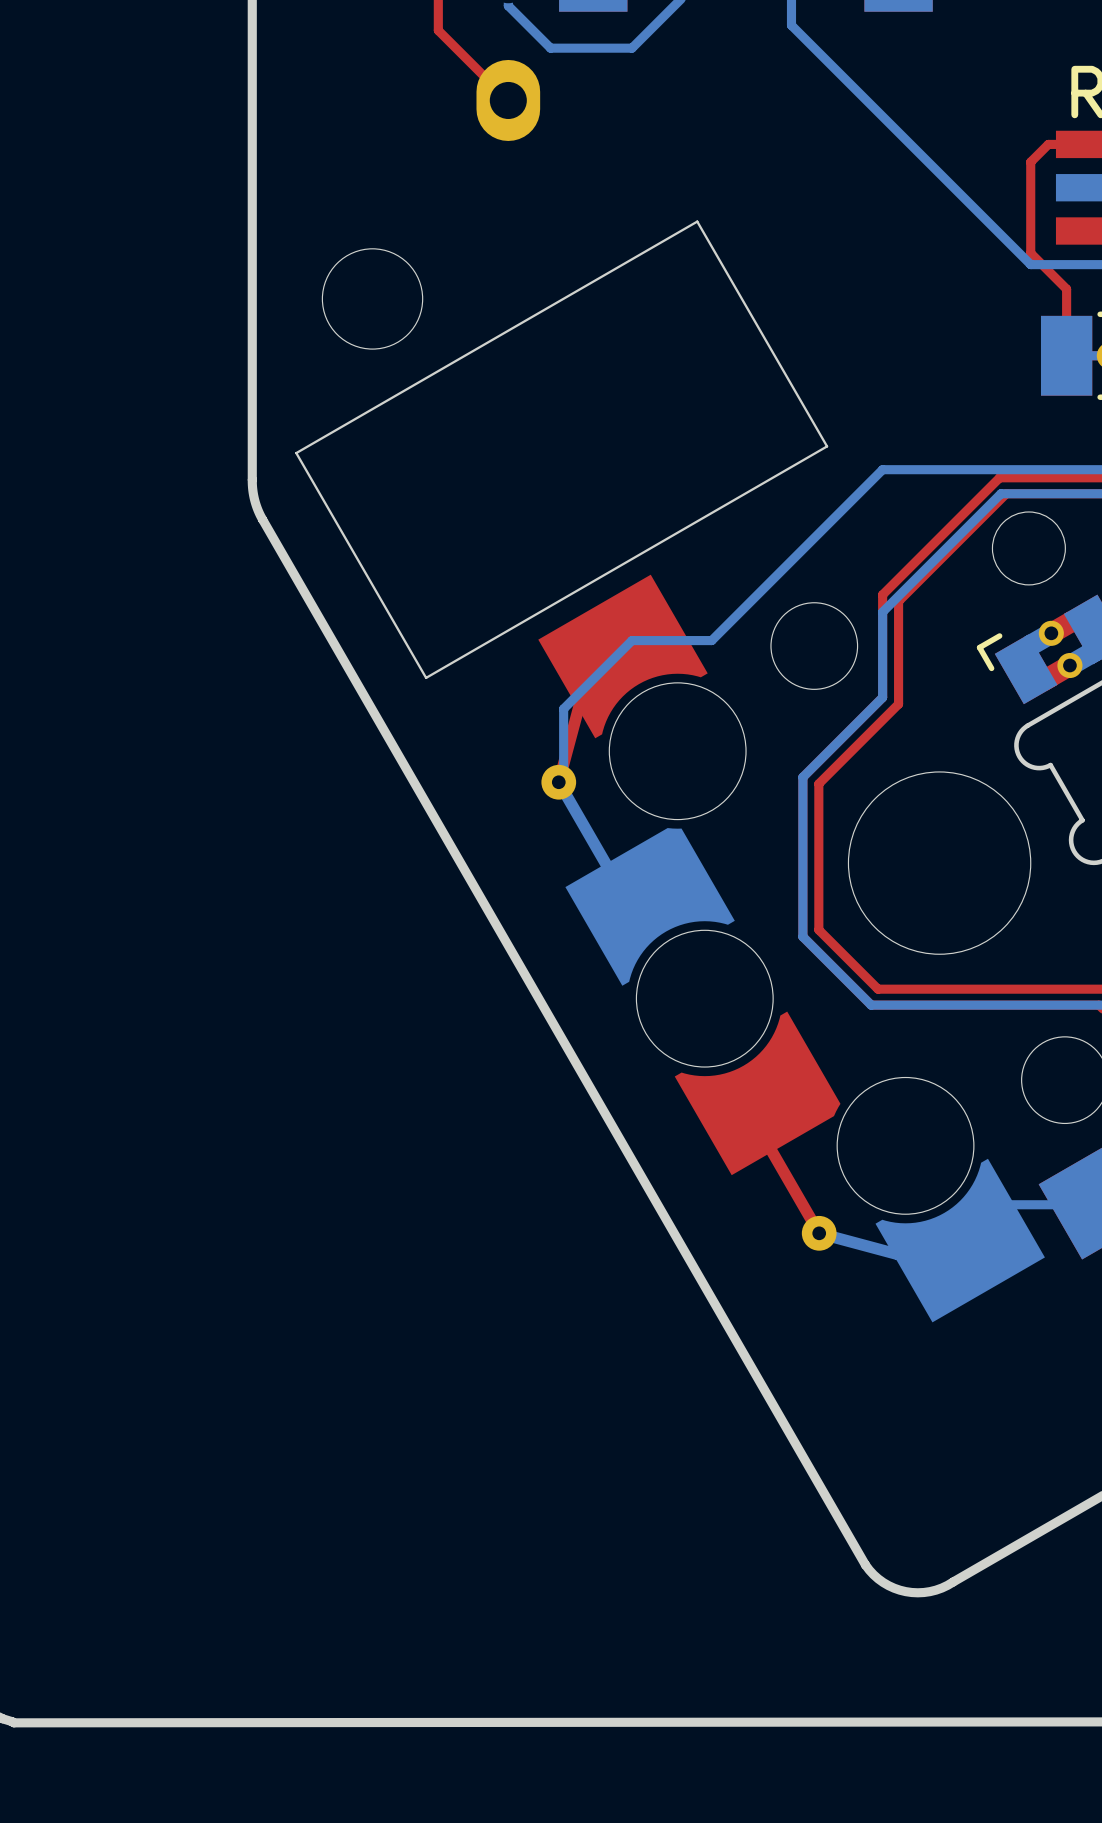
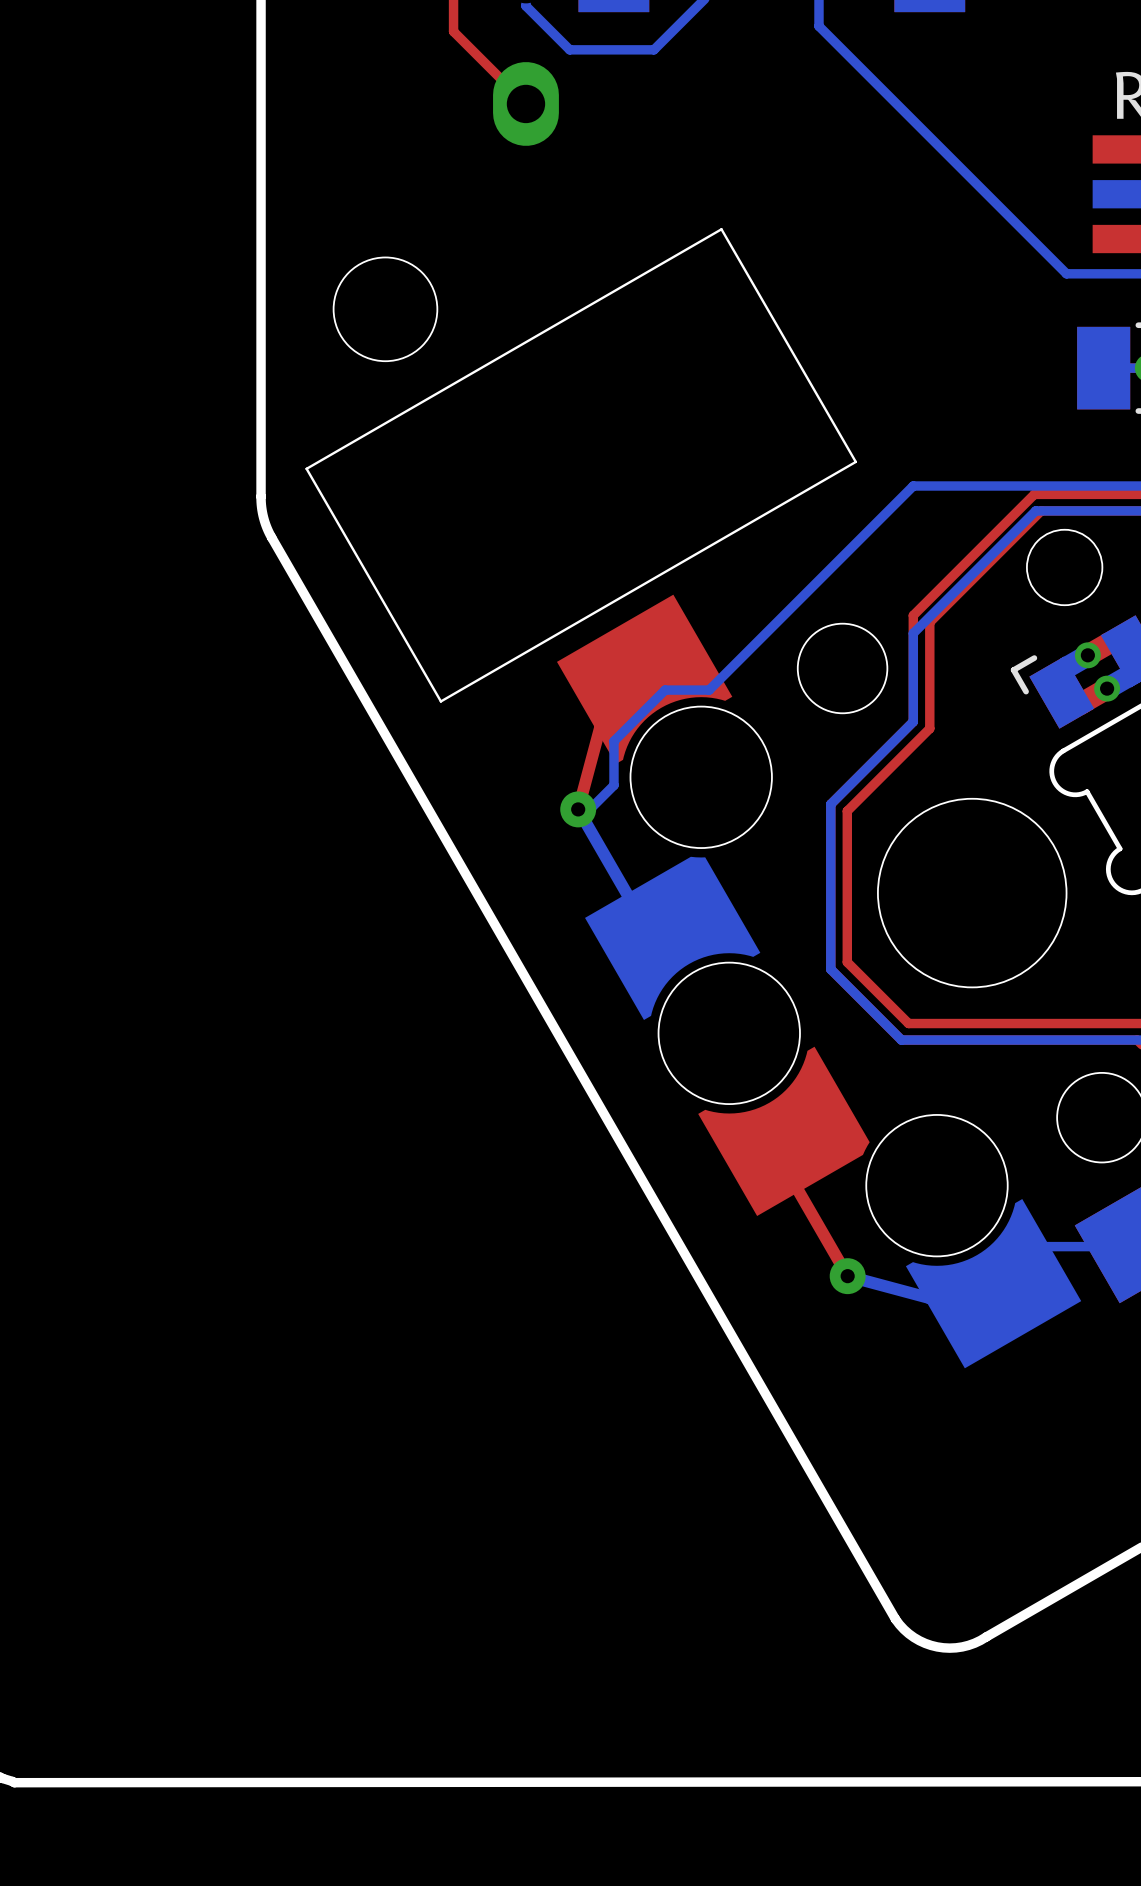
top track: (1089, 144) (1048, 144) (1030, 162) (1030, 253) (1066, 289) (1066, 355) -> none
bottom track: (711, 640) (632, 640) (563, 708) (563, 777) -> (736, 662) (709, 690) (665, 690) (613, 741) (613, 785) (589, 809) (578, 809)

